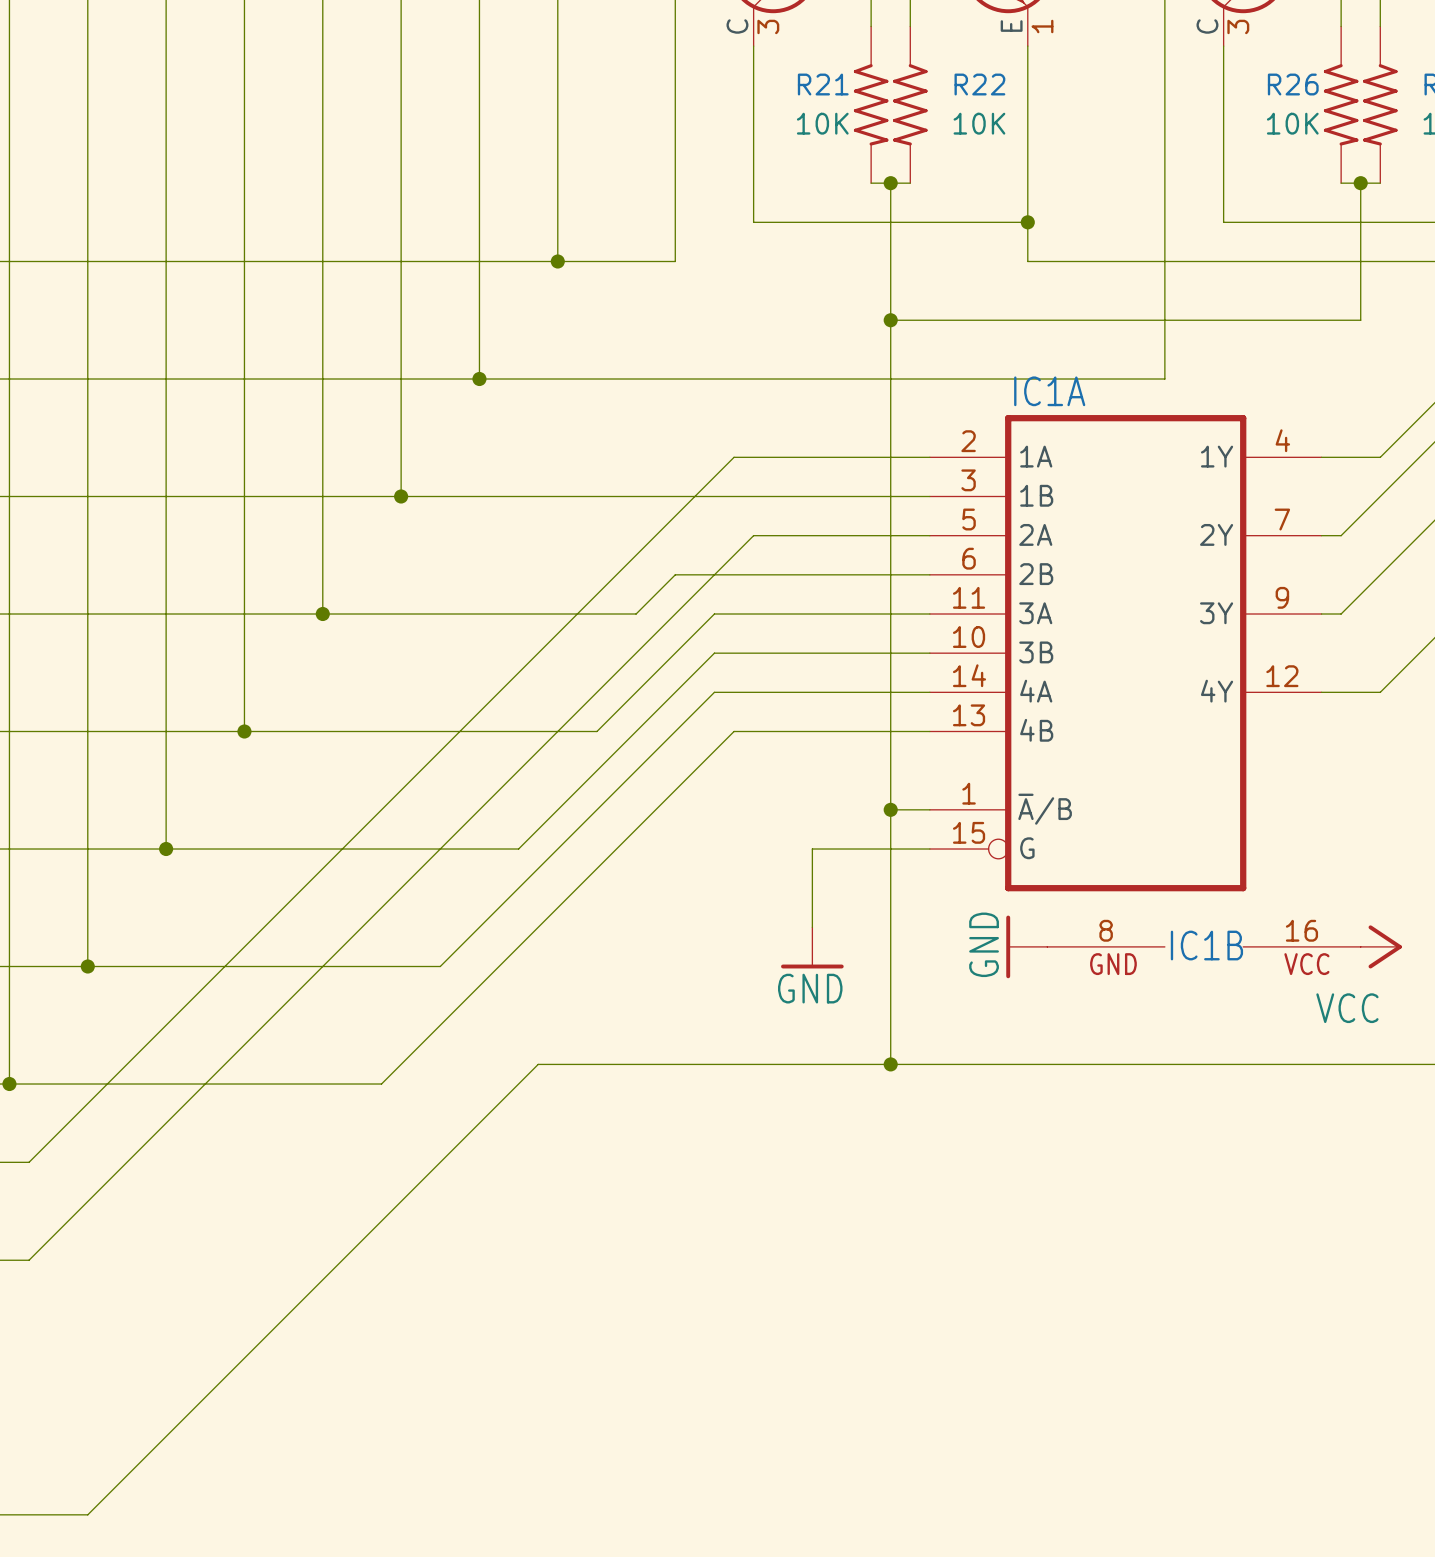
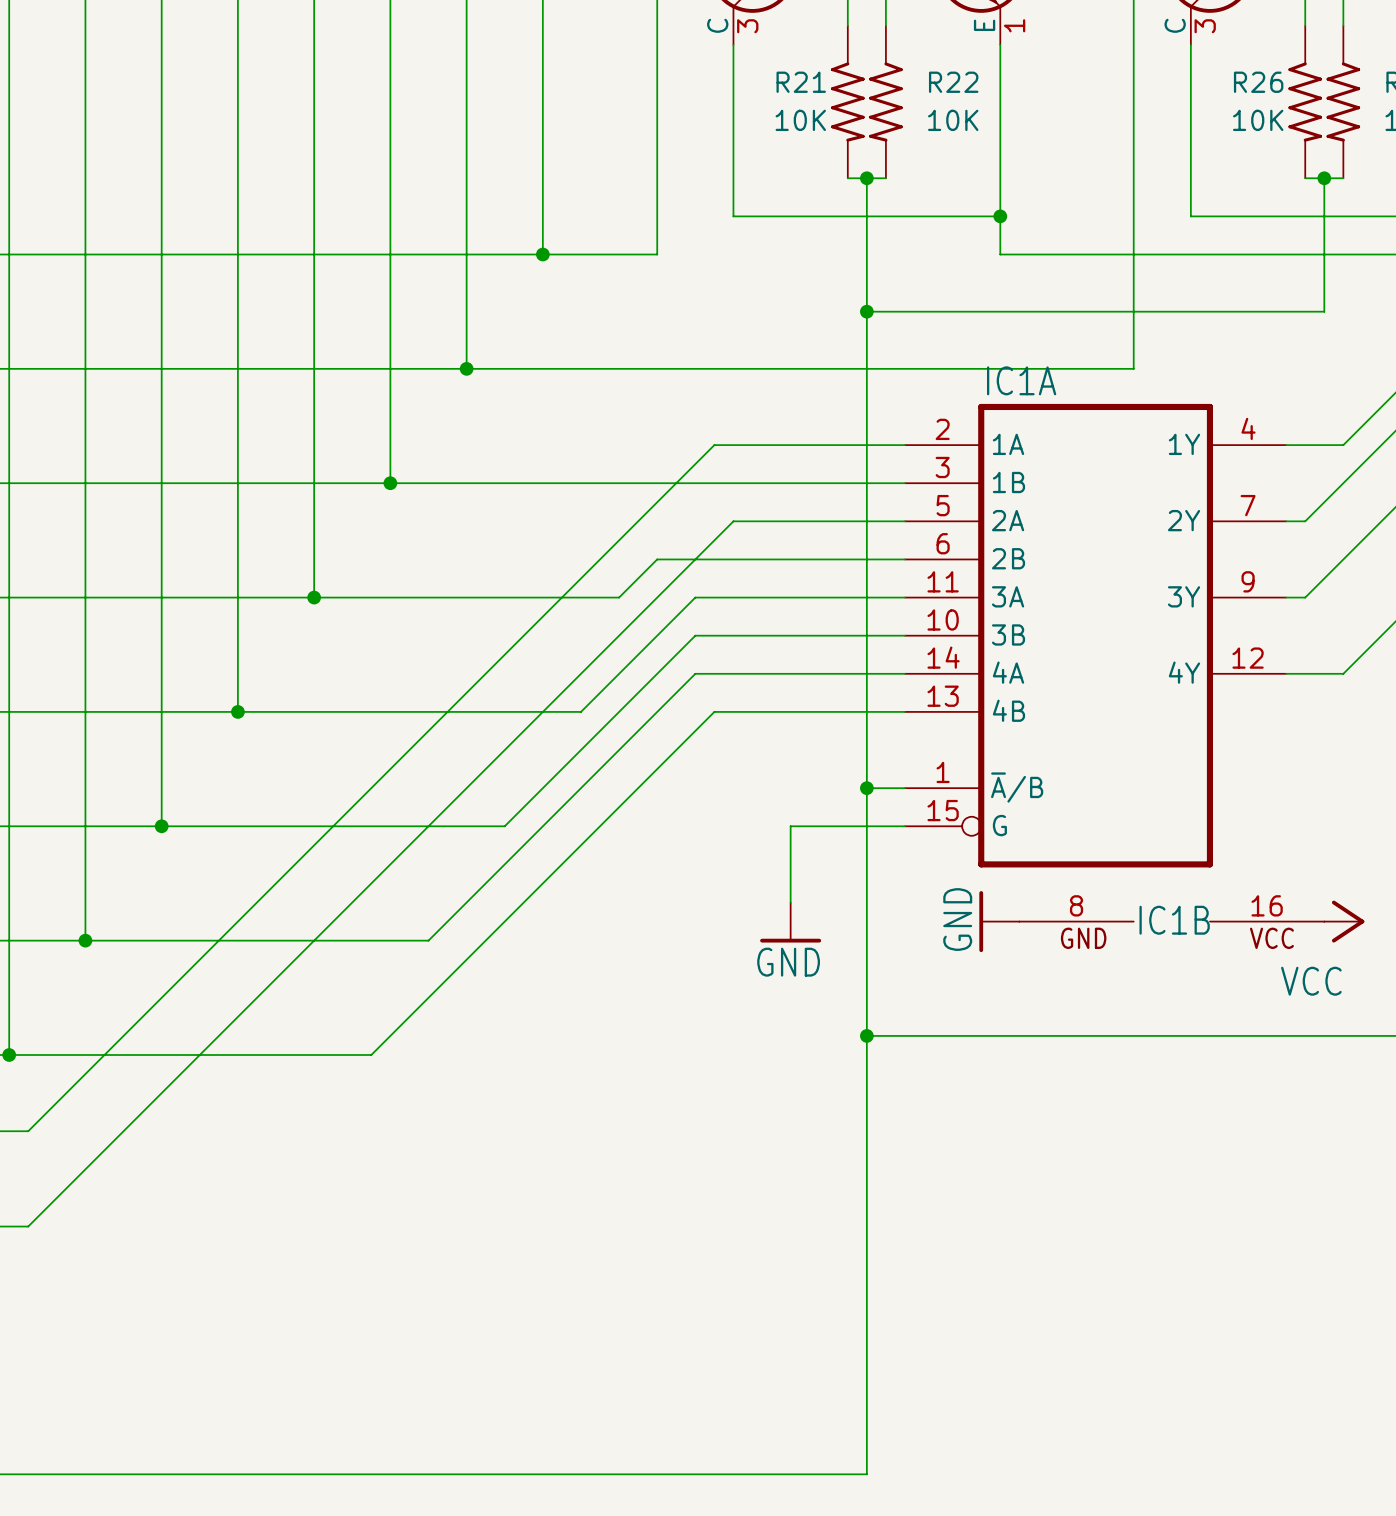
wire: (890, 1064) (538, 1064) (87, 1514) -> (866, 1035) (866, 1474) (85, 1474)

